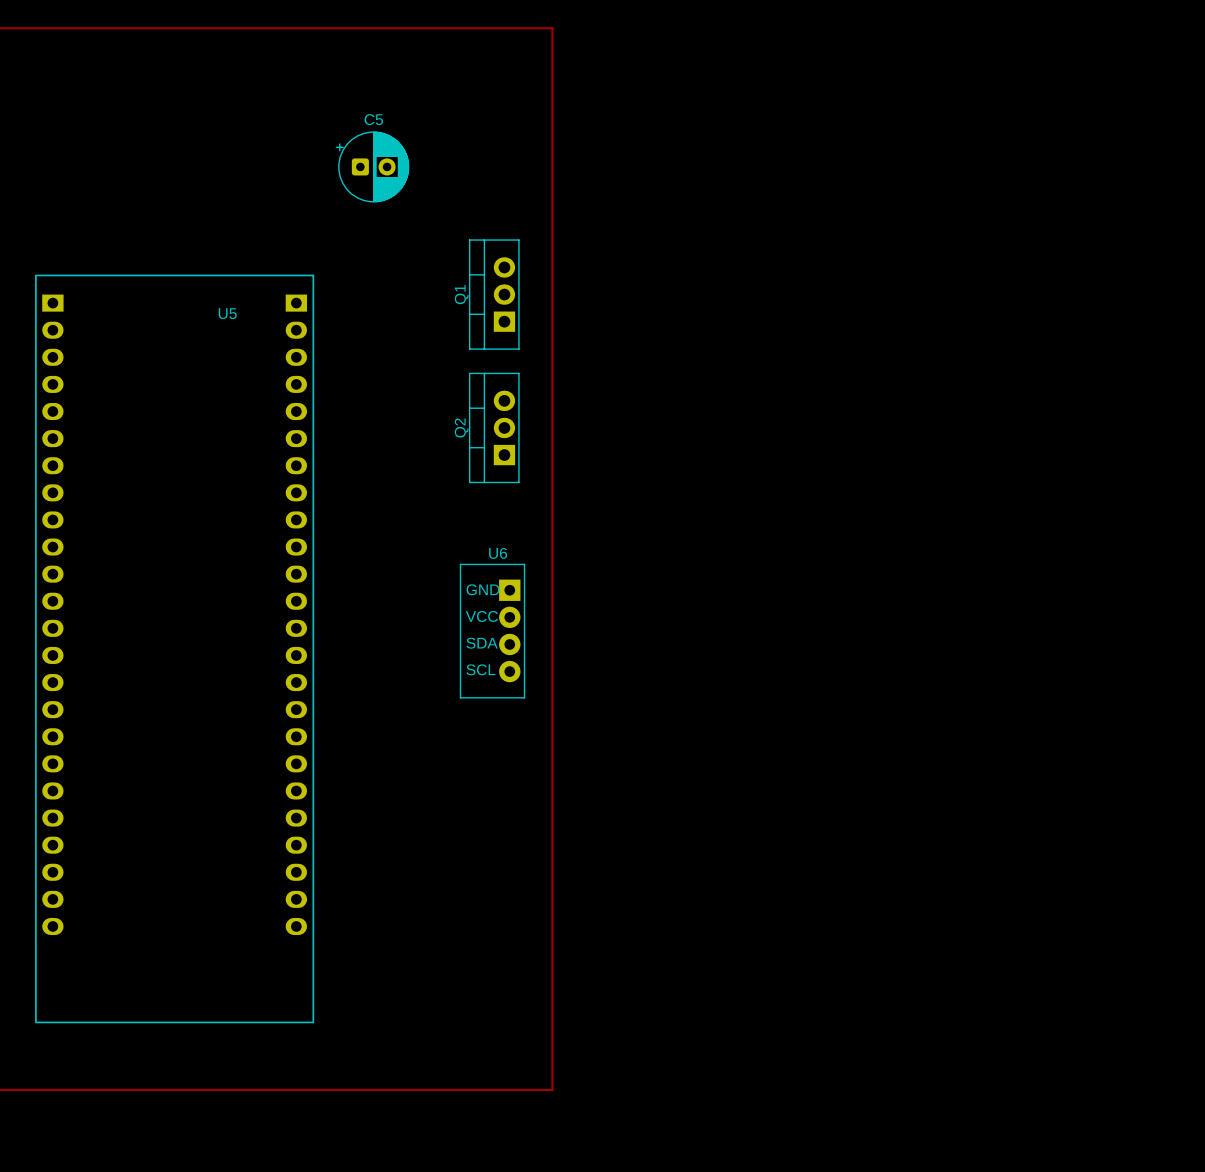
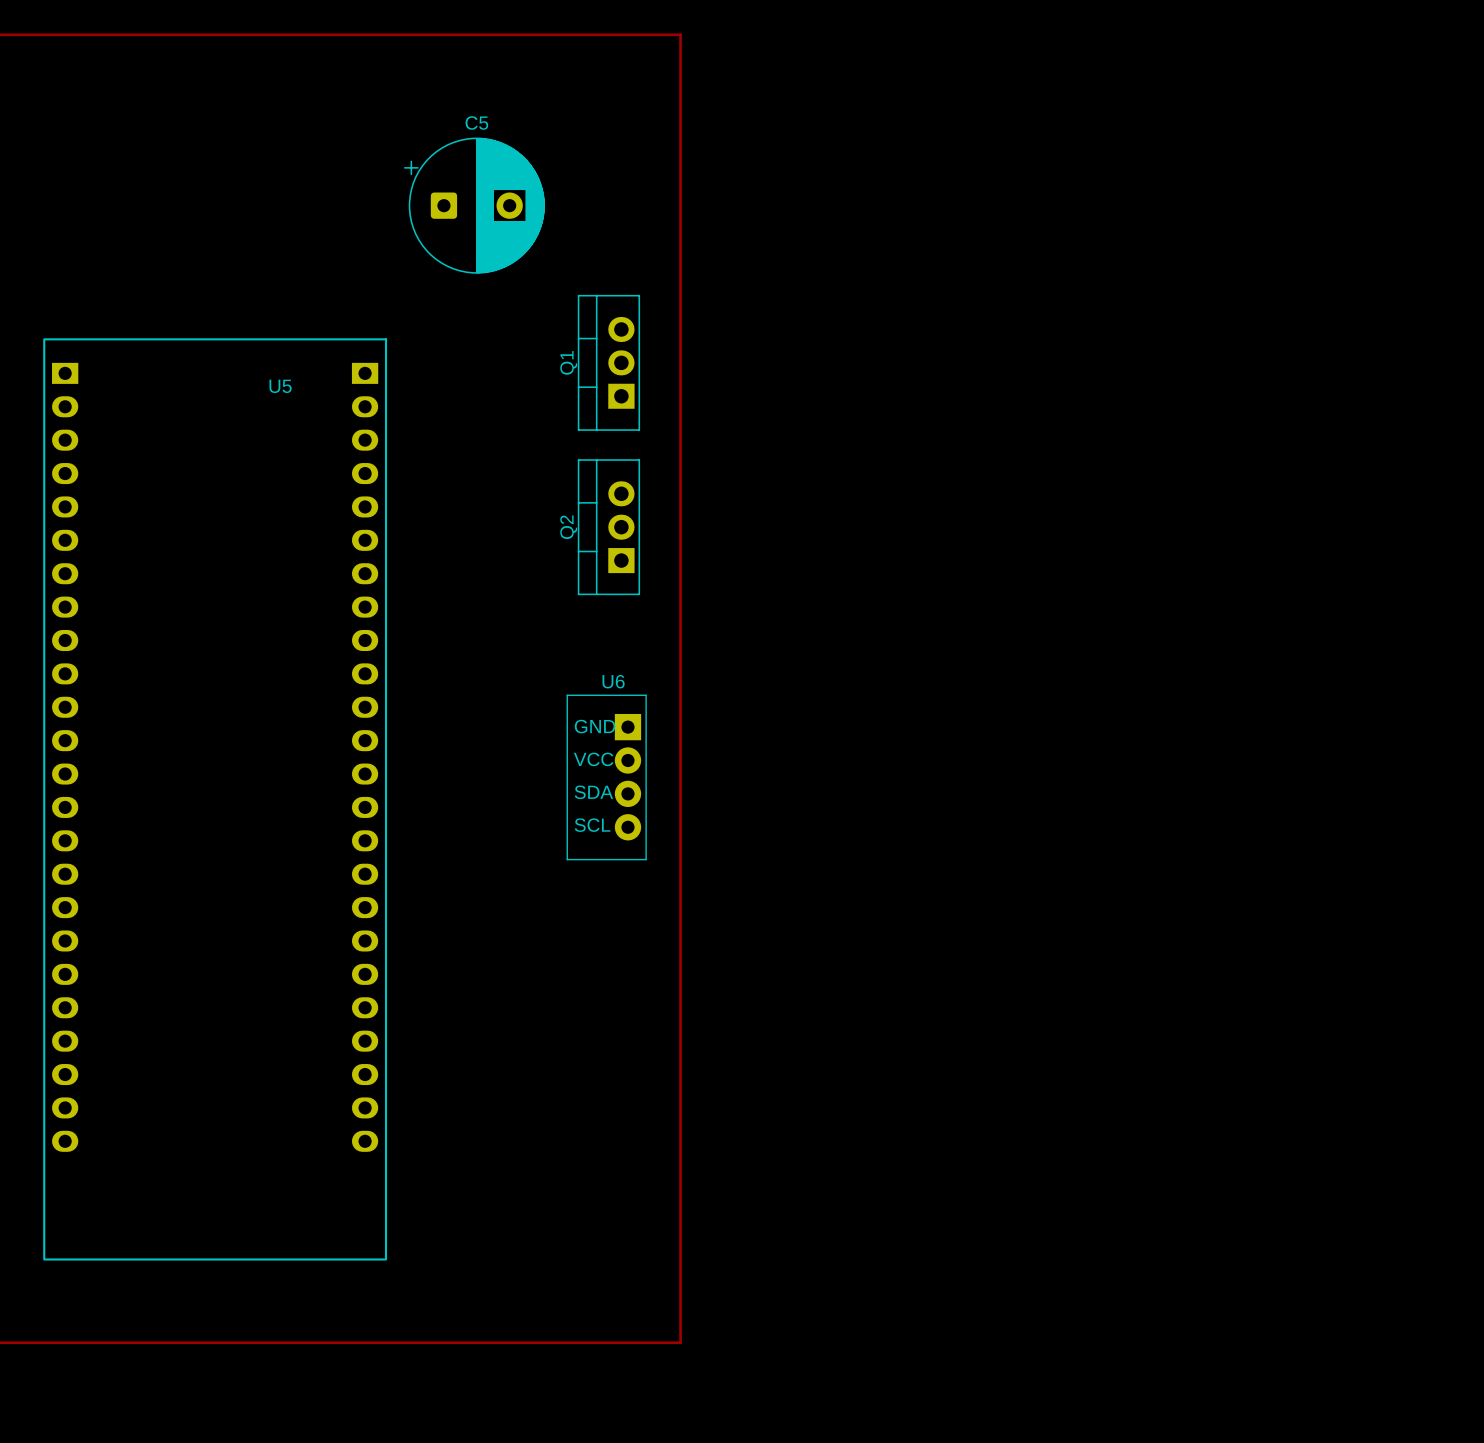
C5 footprint: [335, 131, 410, 203] -> [403, 137, 545, 274]

